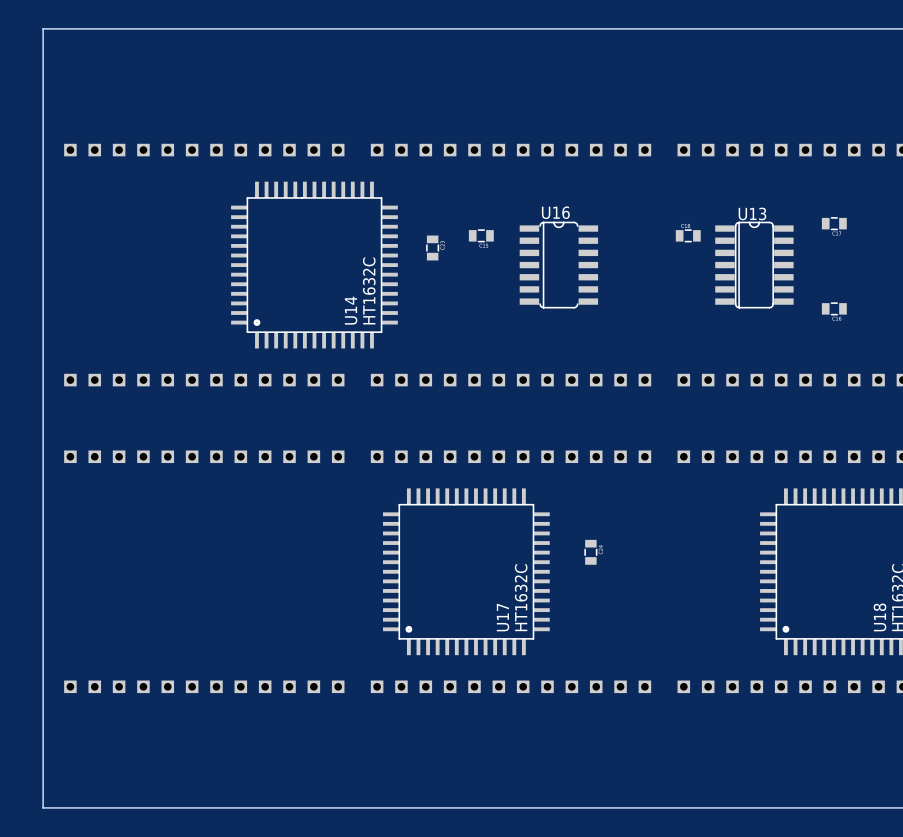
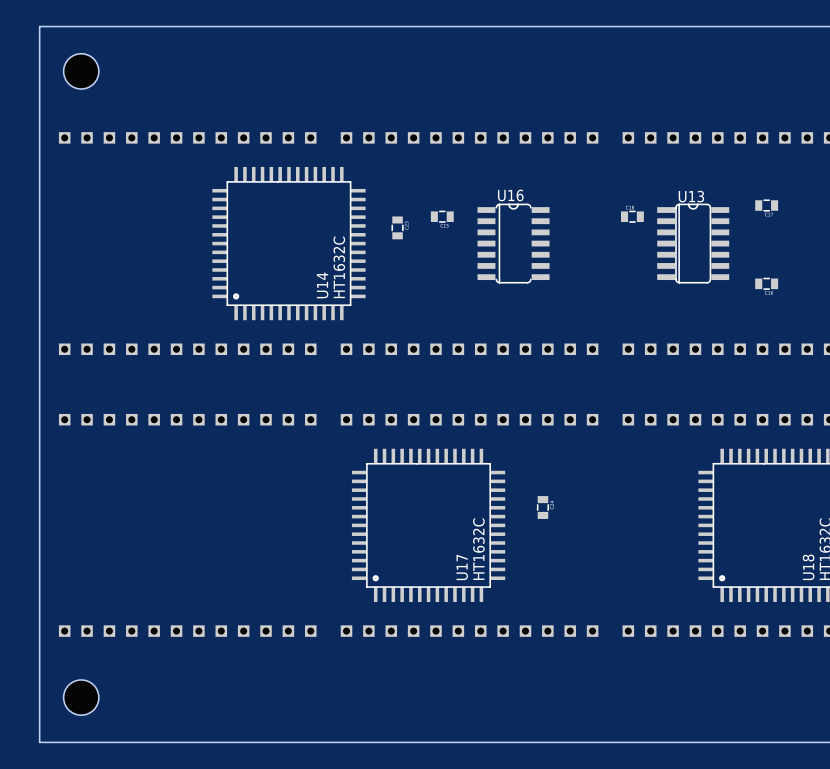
hole: none -> (81, 71)
hole: none -> (81, 697)

